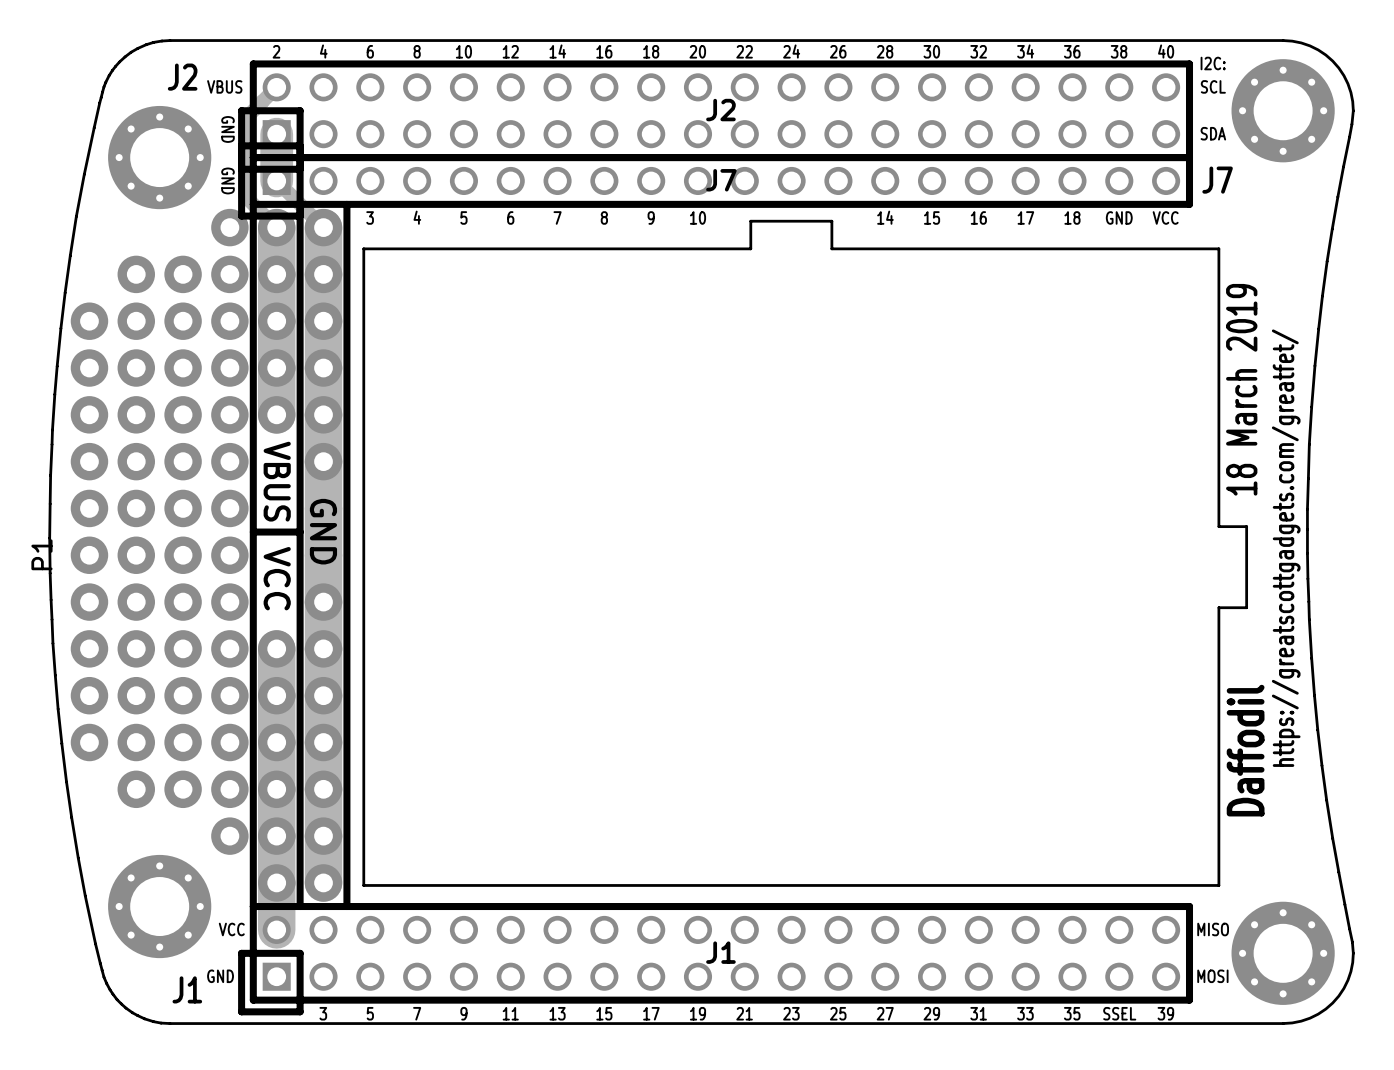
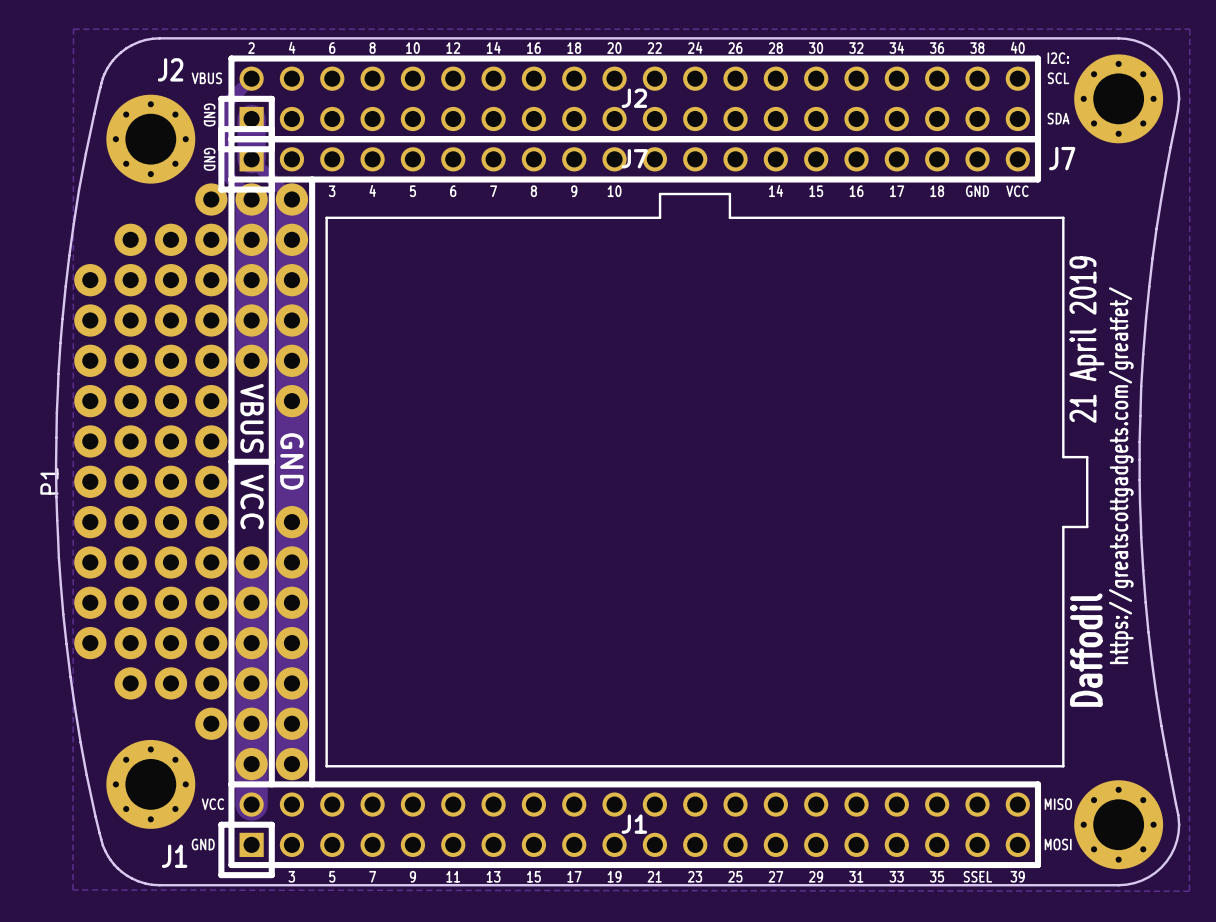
zone outline: none -> (73, 29) (1189, 29) (1189, 891) (73, 889) (73, 29)
text: 18 March 2019 (1241, 389) -> 21 April 2019 (1086, 339)

